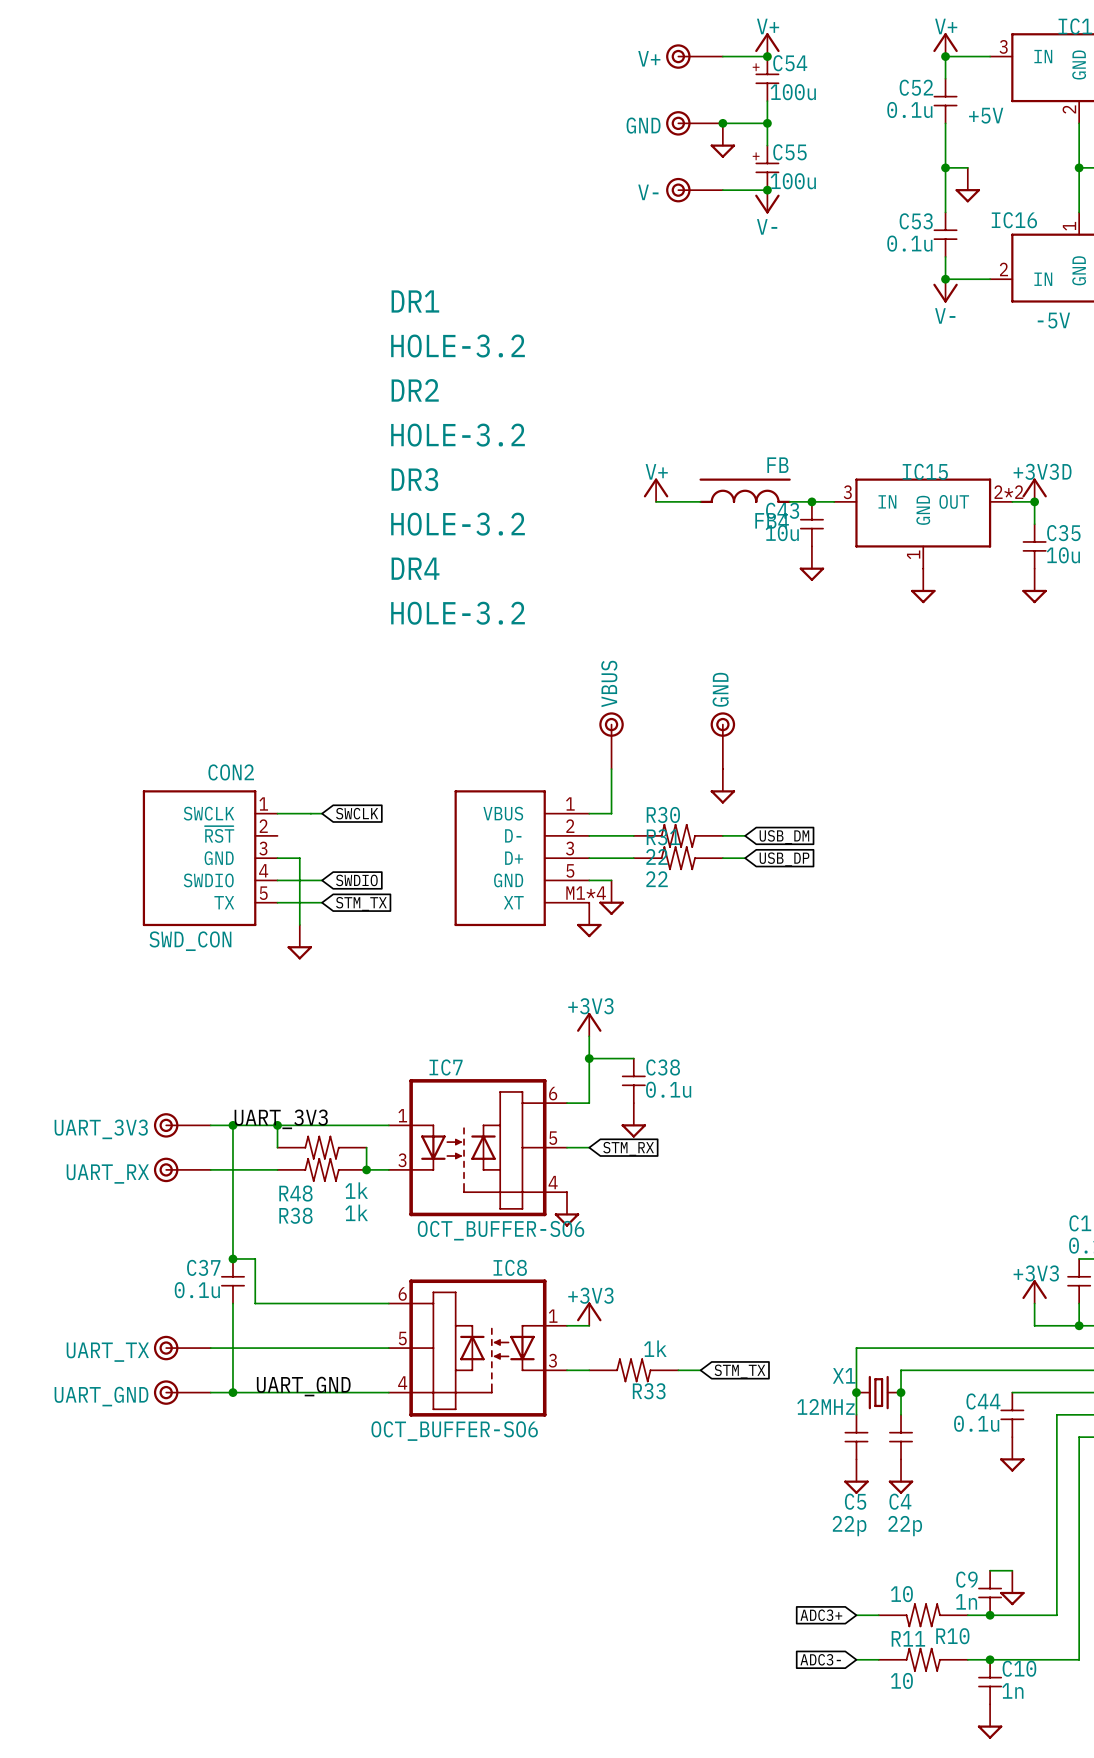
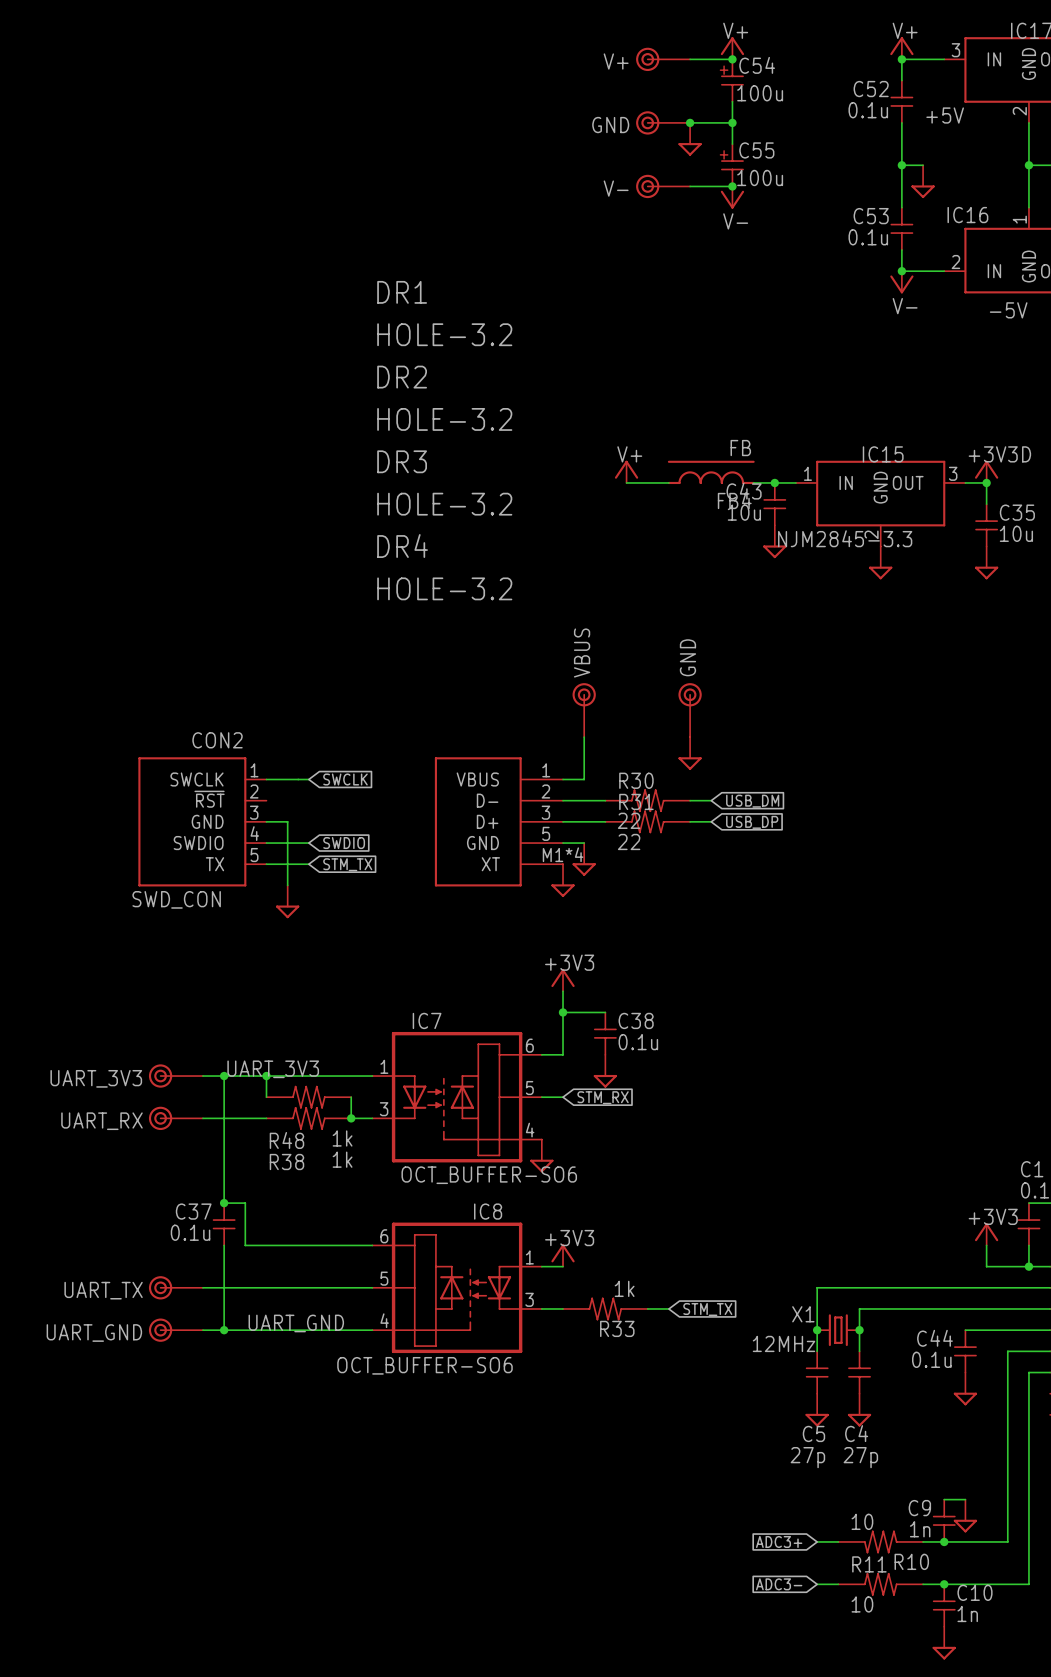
IC15 pin number: 3 (847, 492) -> 1 (807, 473)
IC15 pin number: 2*2 (1008, 492) -> 3 (953, 473)
IC15 pin number: 1 (913, 554) -> 2 (871, 534)
IC15 value: none -> NJM2845-3.3 (845, 538)
C5 value: 22p (849, 1526) -> 27p (807, 1457)
C4 value: 22p (905, 1526) -> 27p (860, 1457)

